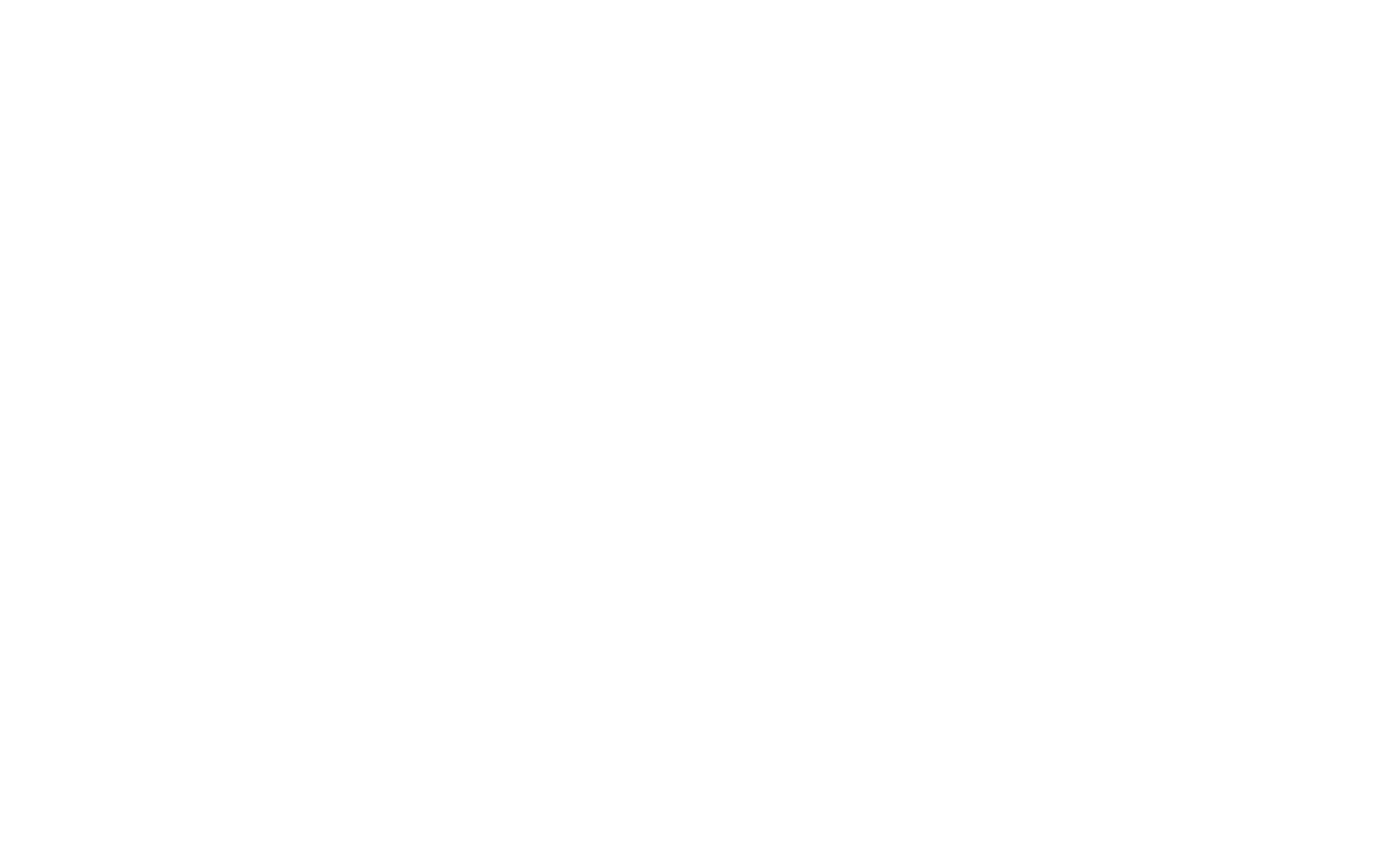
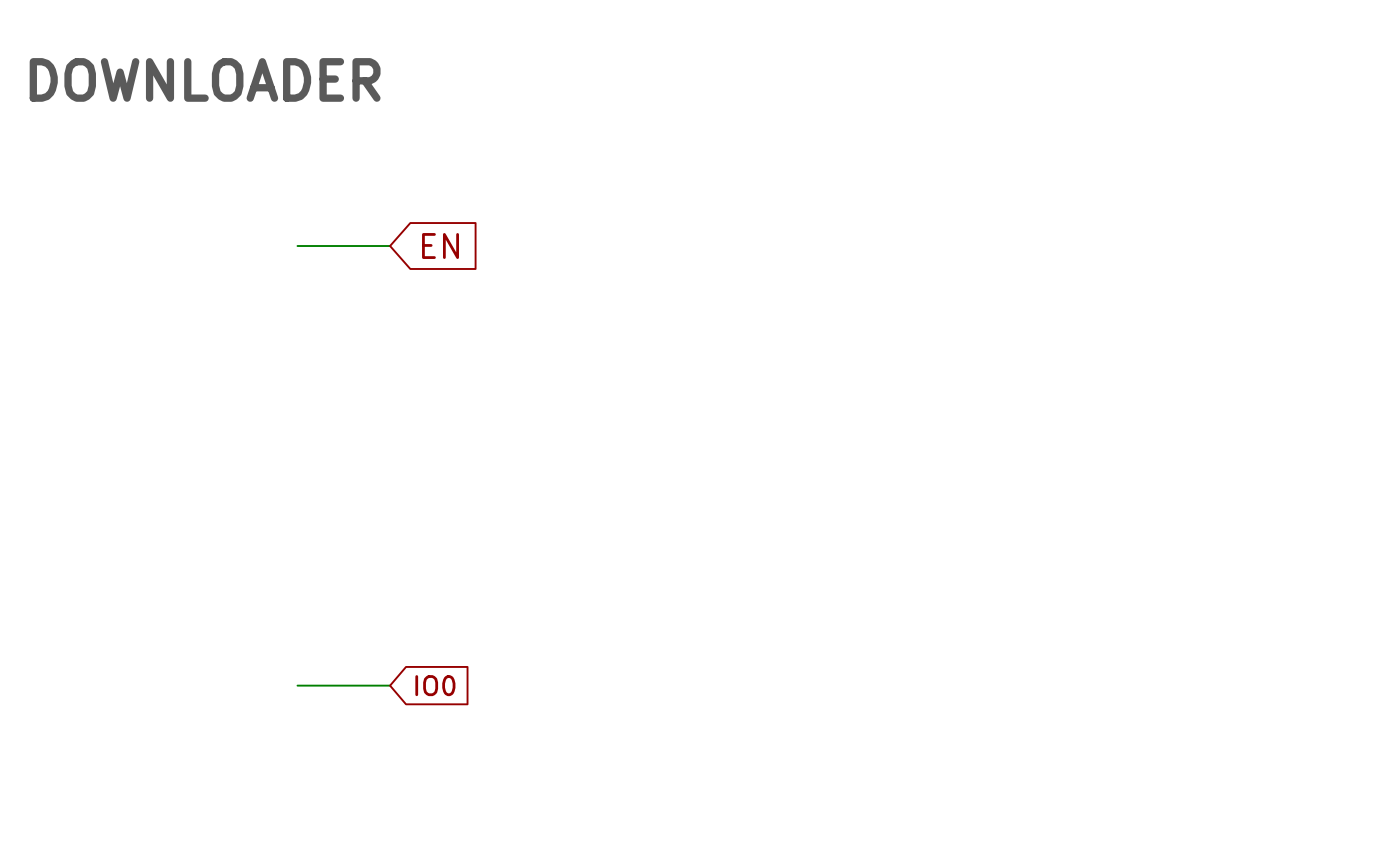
text: none -> DOWNLOADER (205, 79)
wire: none -> (297, 246) (390, 246)
global label: none -> EN (440, 246)
wire: none -> (297, 685) (390, 685)
global label: none -> IO0 (435, 685)

